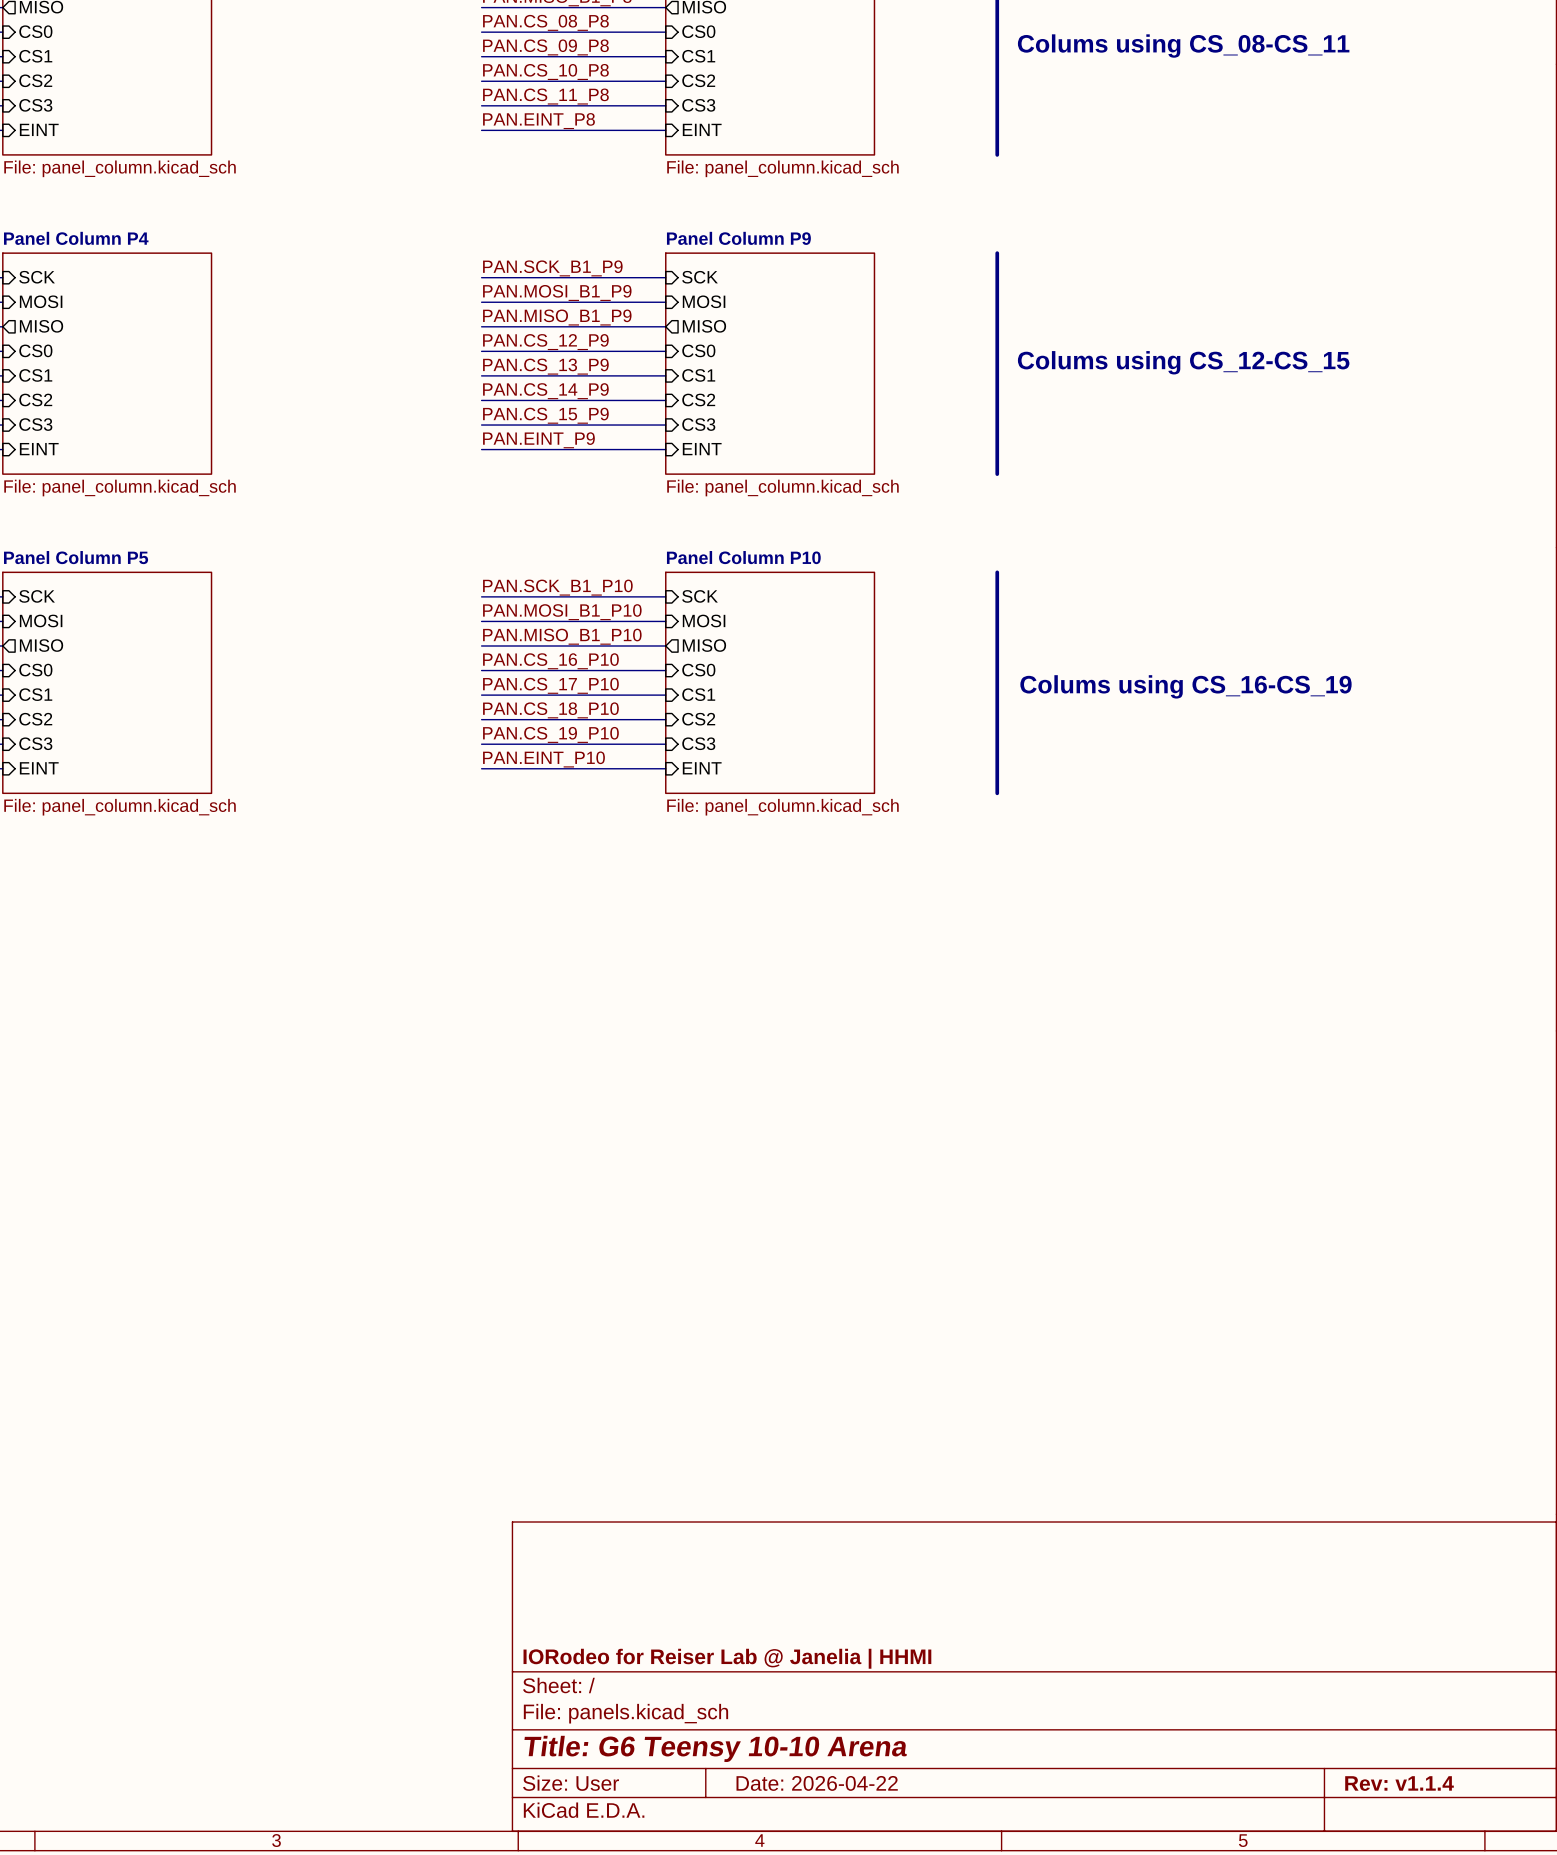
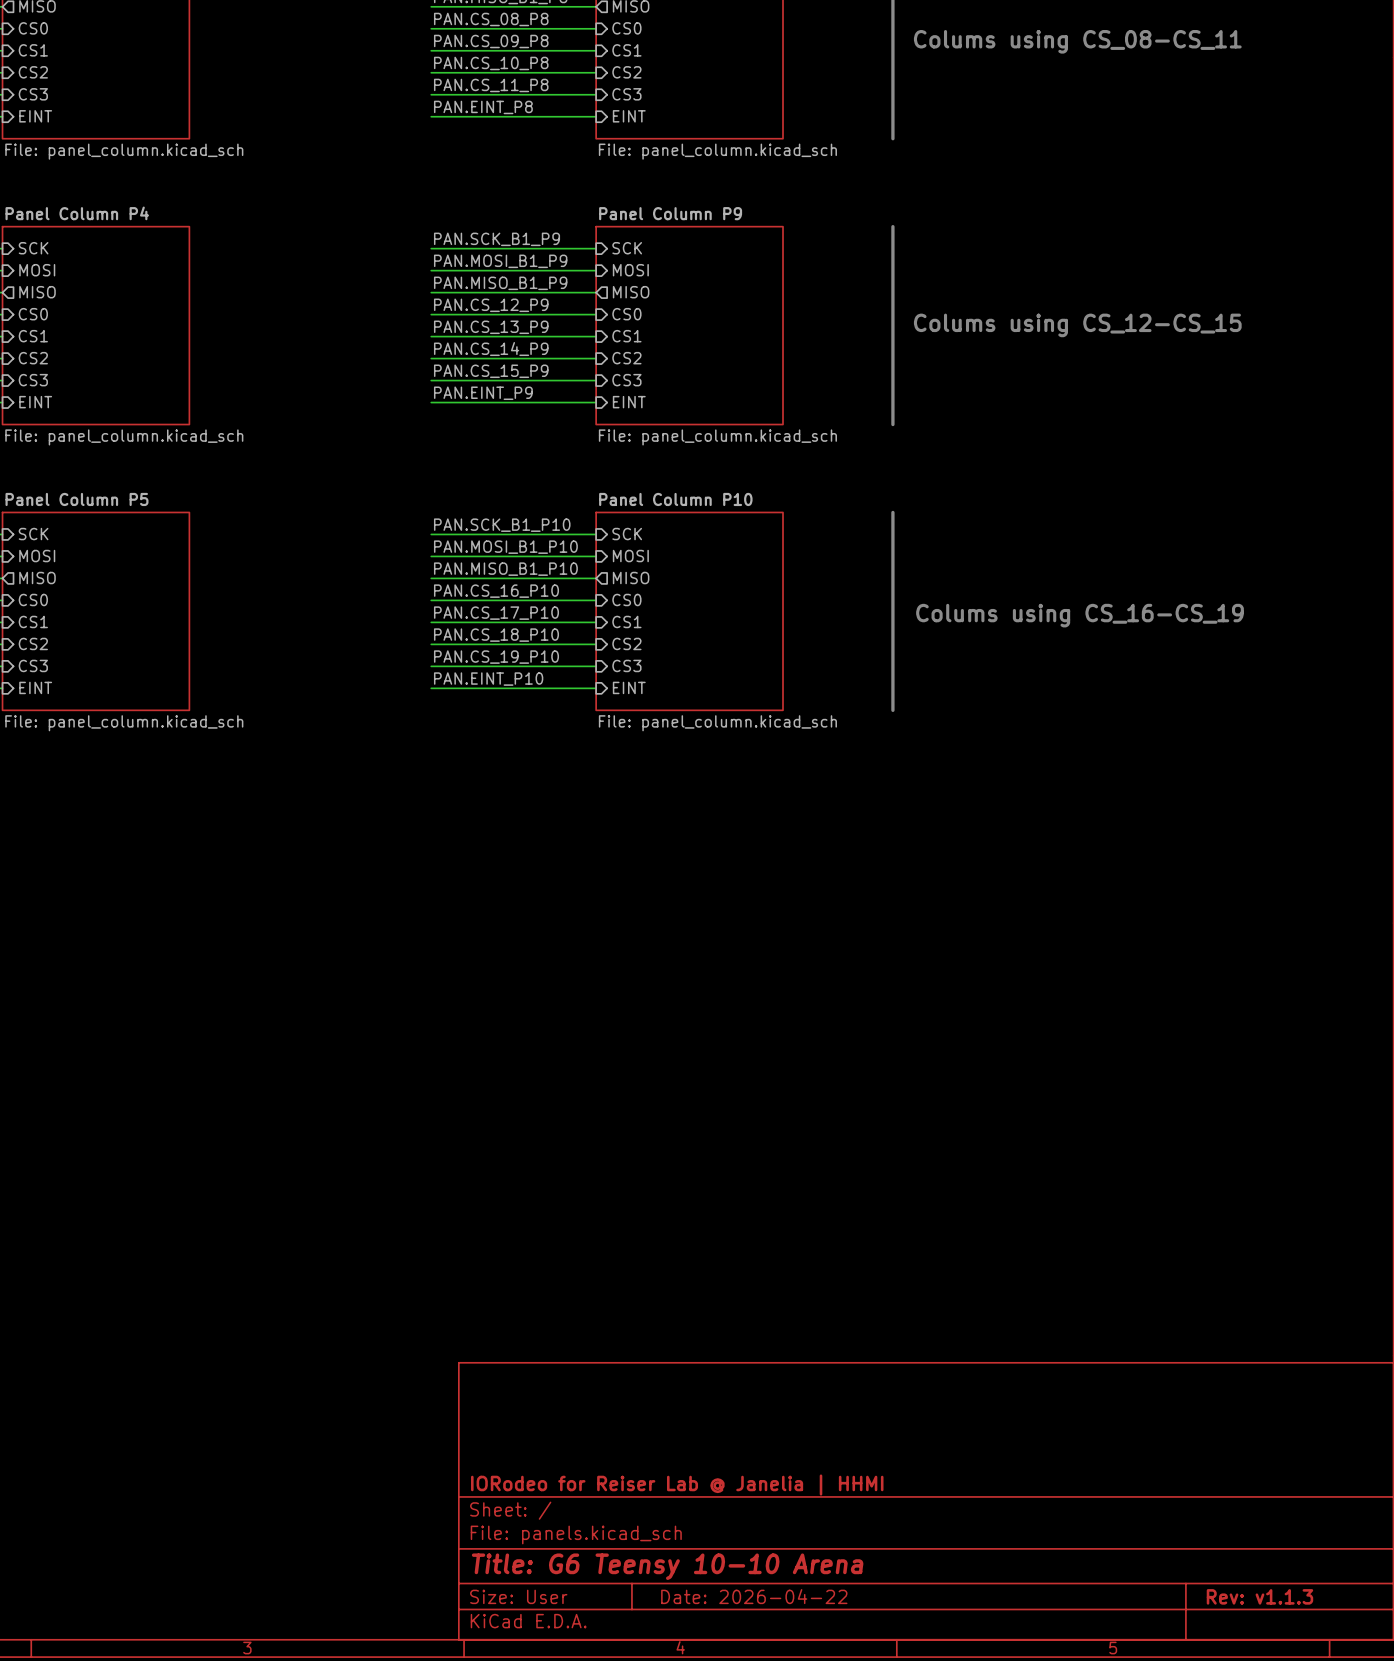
title block: Rev: v1.1.4 (1399, 1783) -> Rev: v1.1.3 (1259, 1596)

